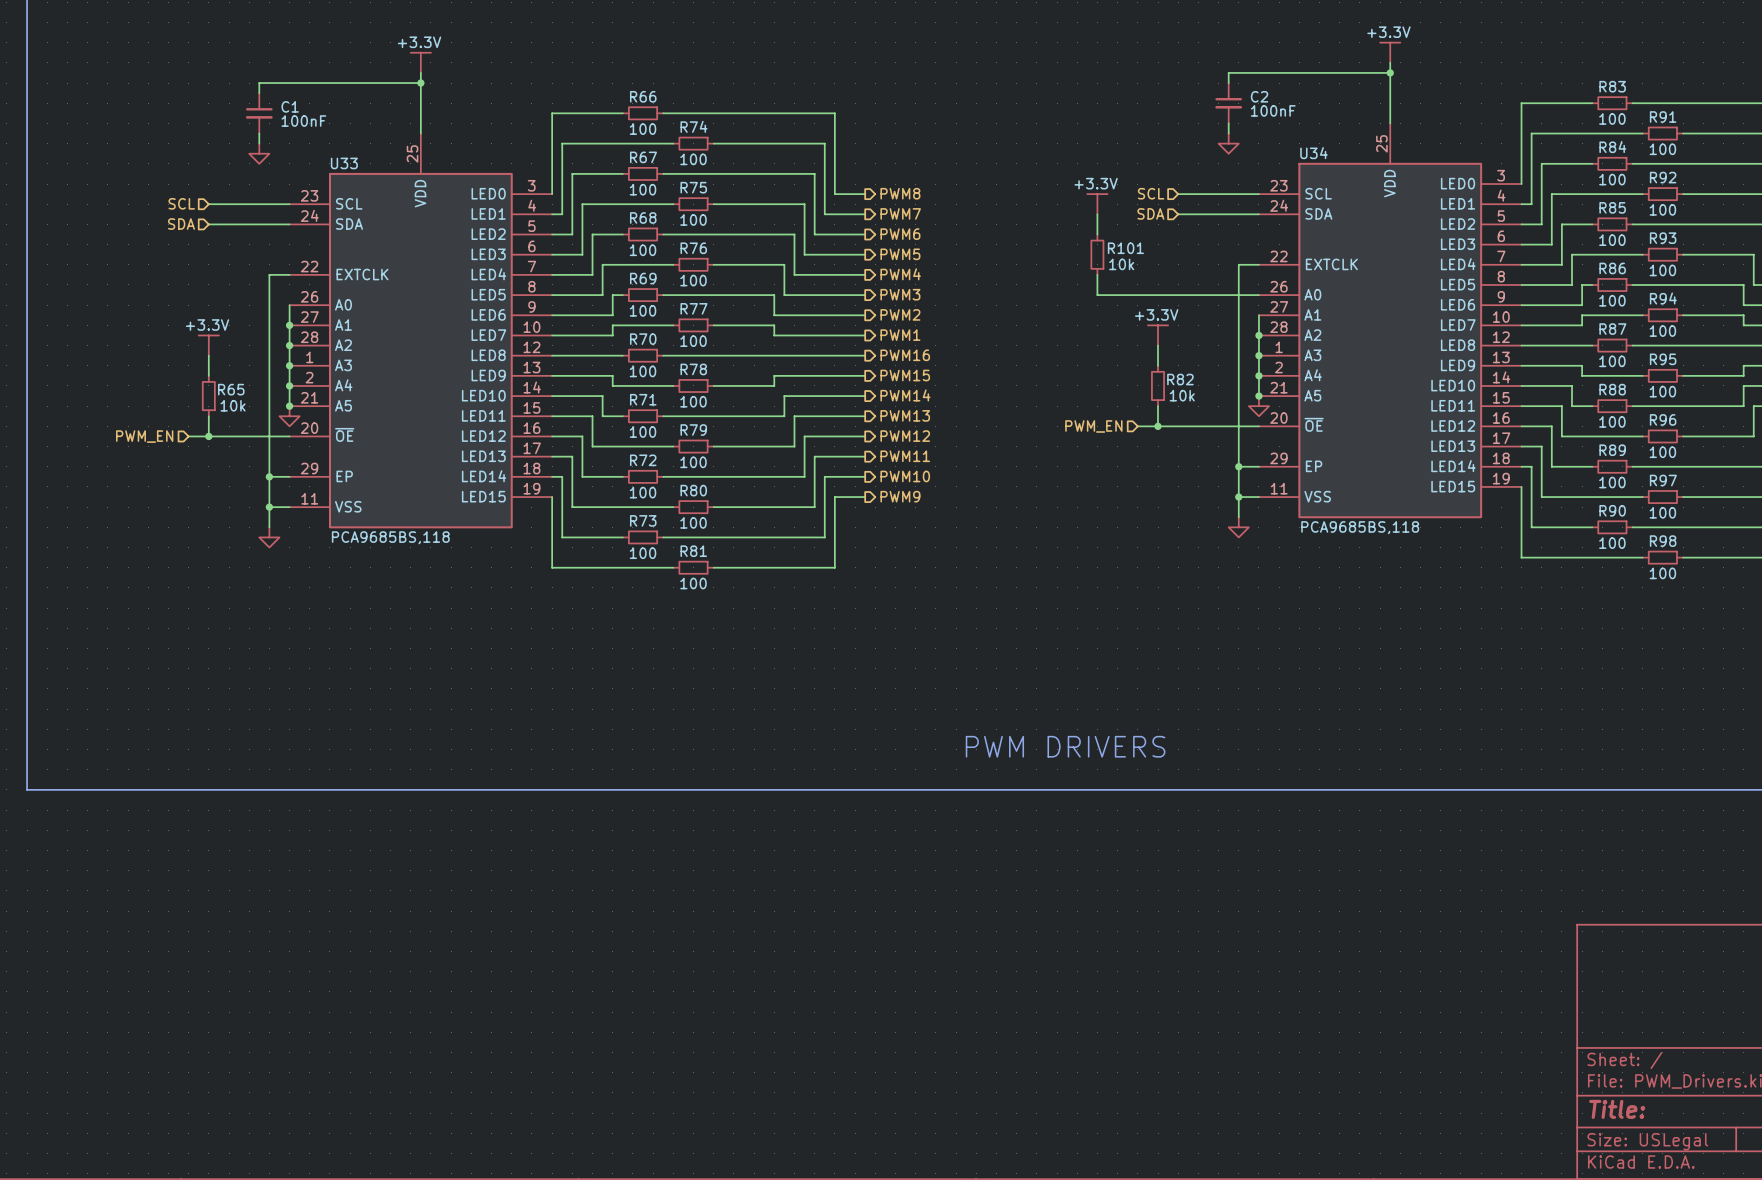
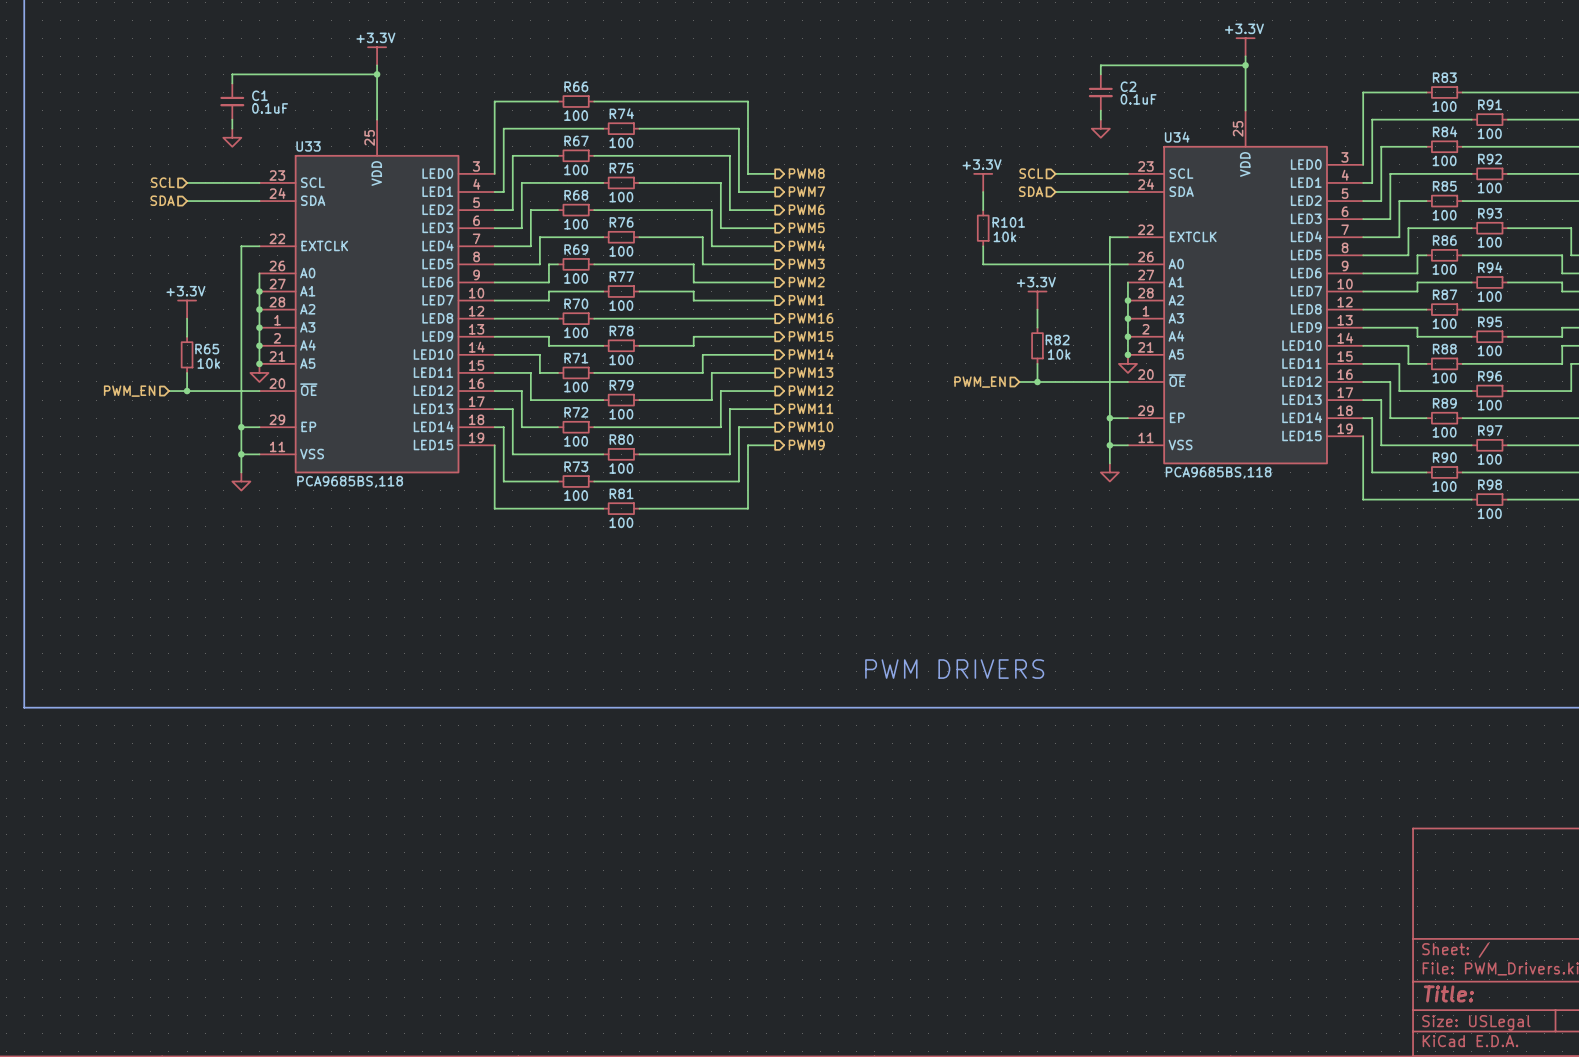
C2 value: 100nF (1273, 110) -> 0.1uF (1138, 99)
C1 value: 100nF (303, 121) -> 0.1uF (270, 108)

